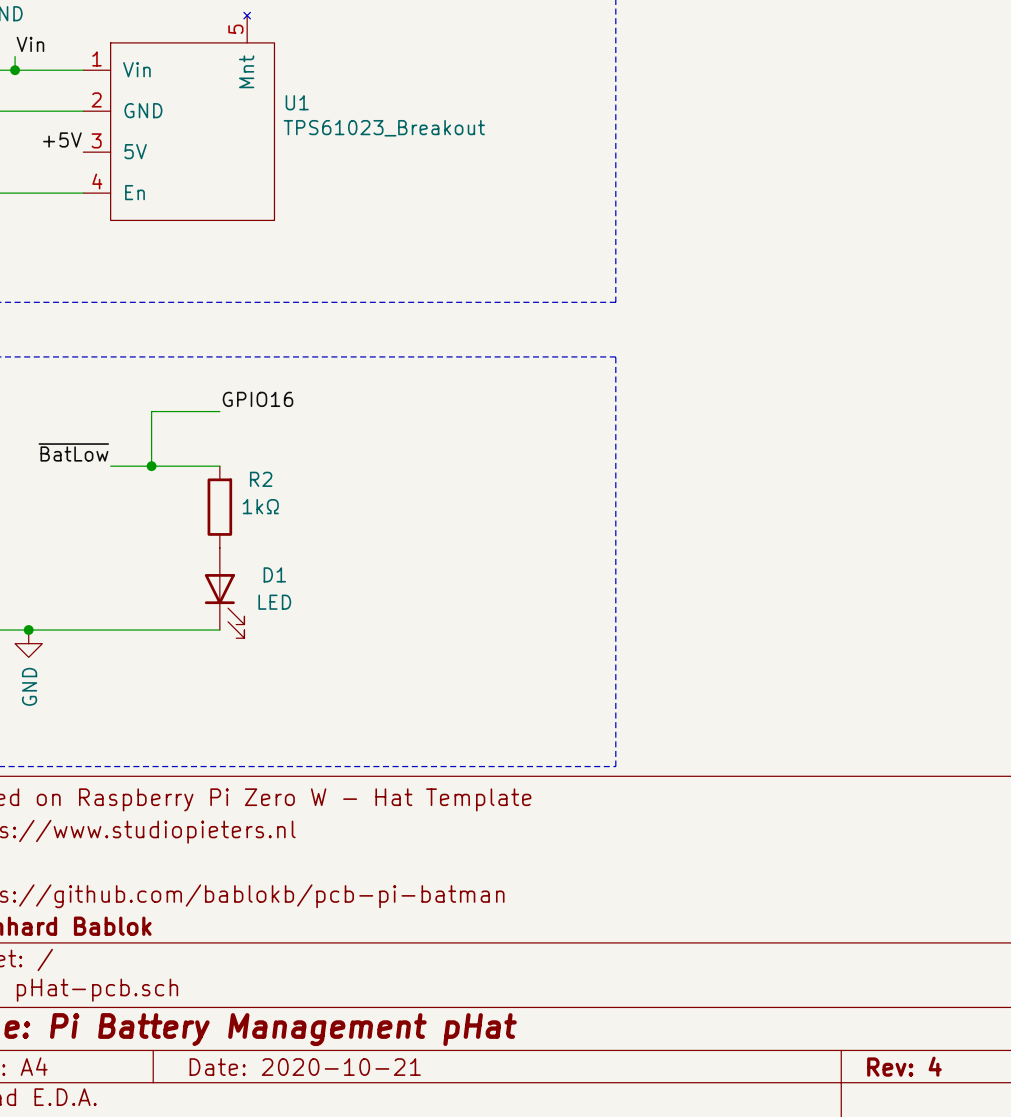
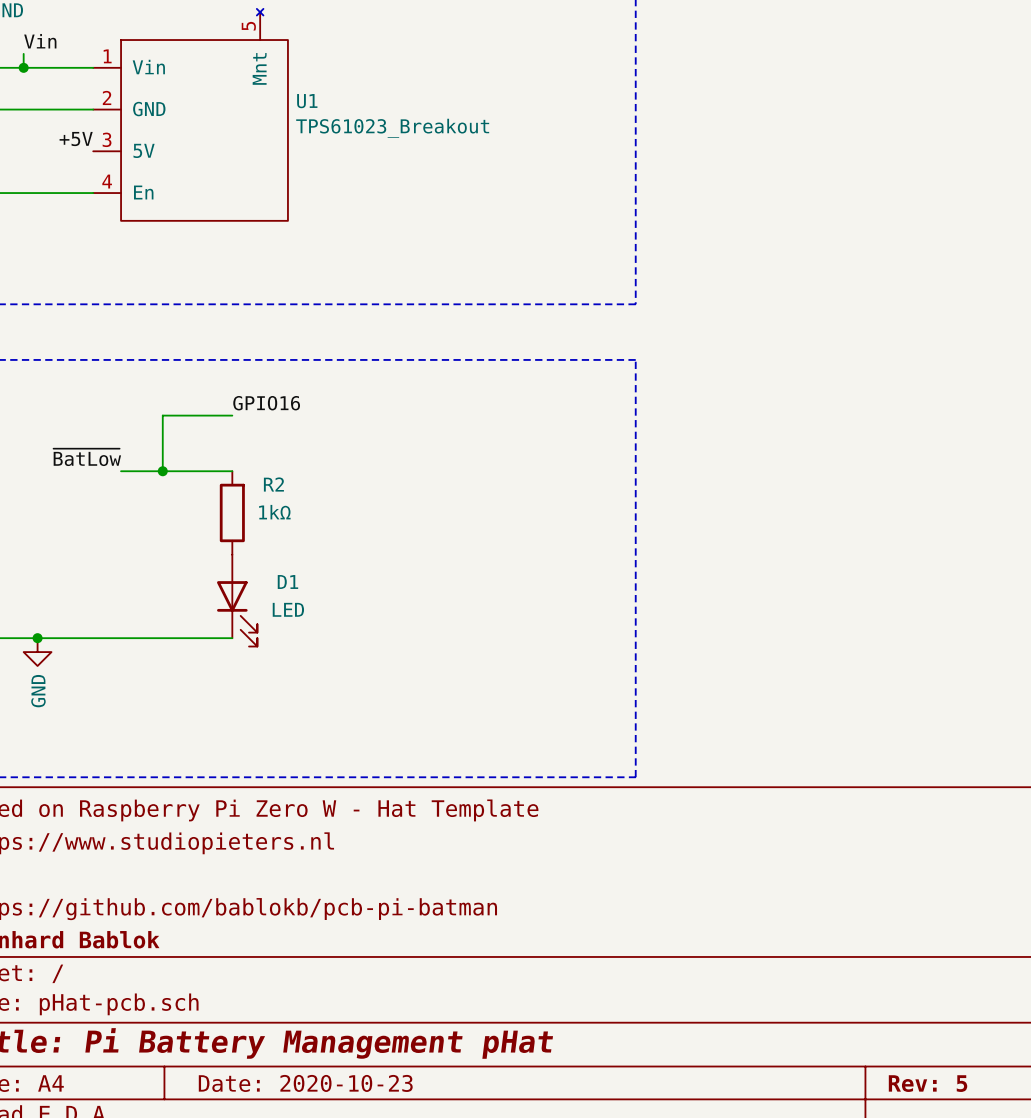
title block: Rev: 4 (904, 1066) -> Rev: 5 (928, 1083)
title block: Date: 2020-10-21 (305, 1067) -> Date: 2020-10-23 (305, 1083)

